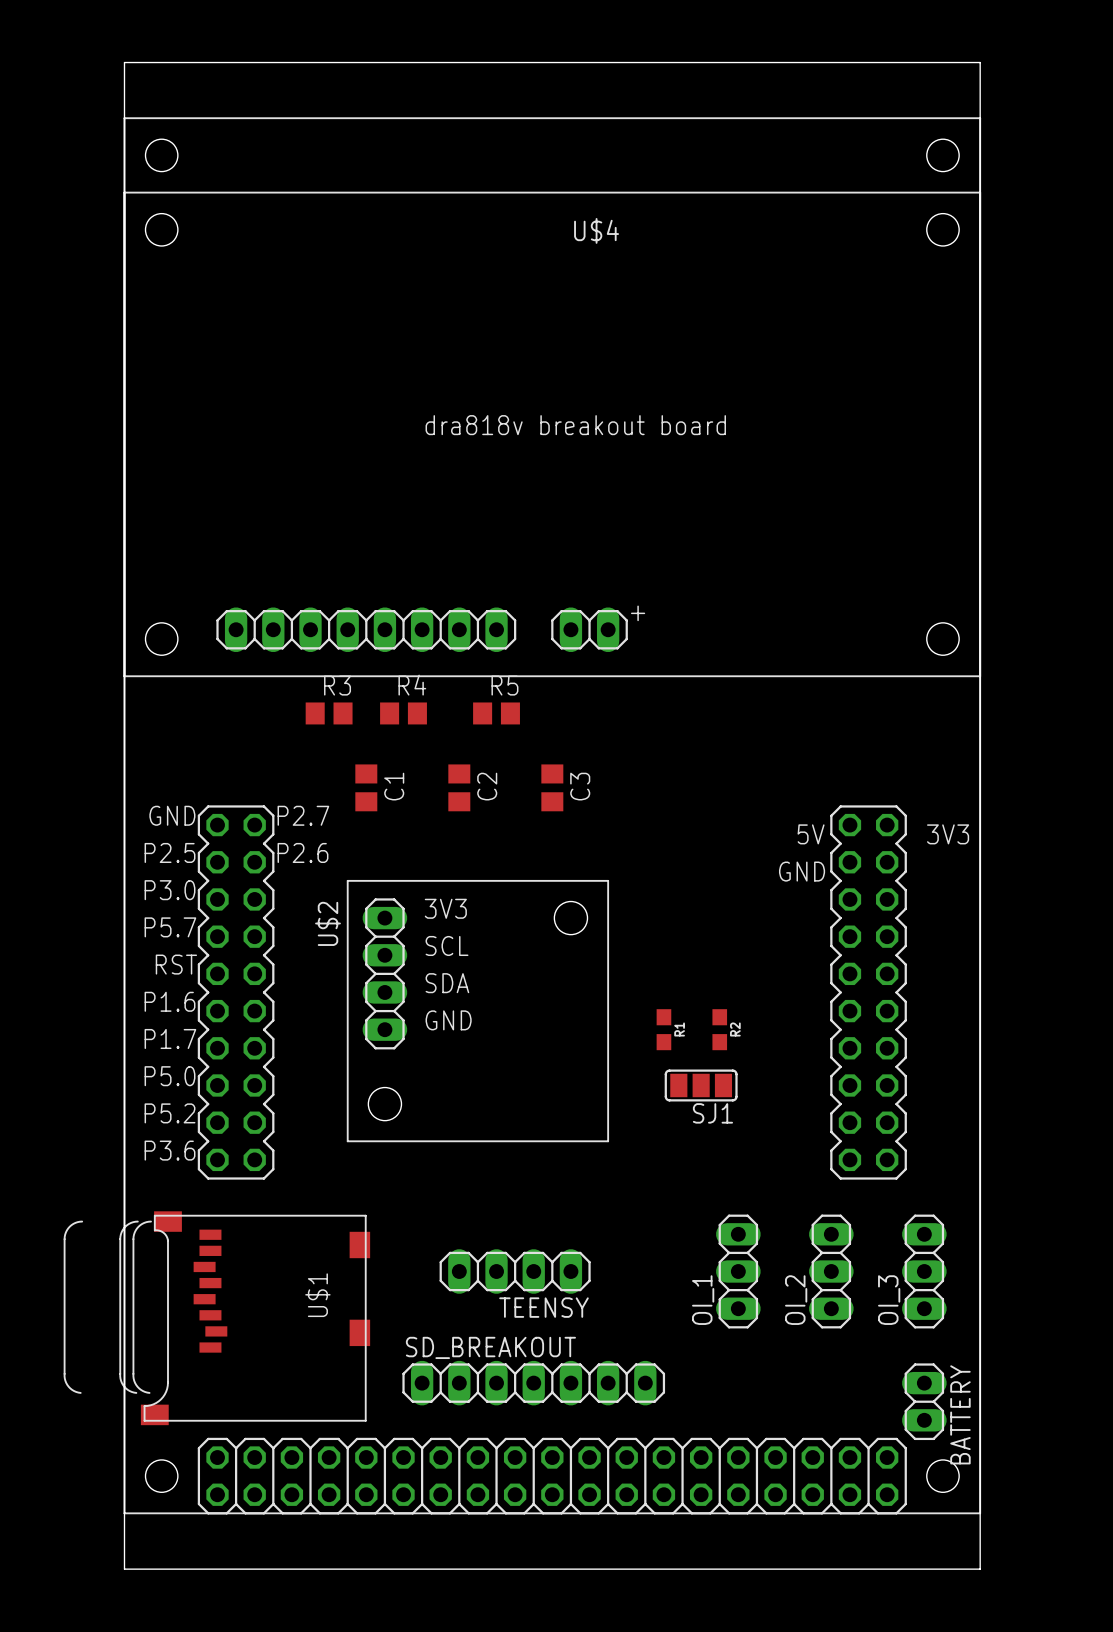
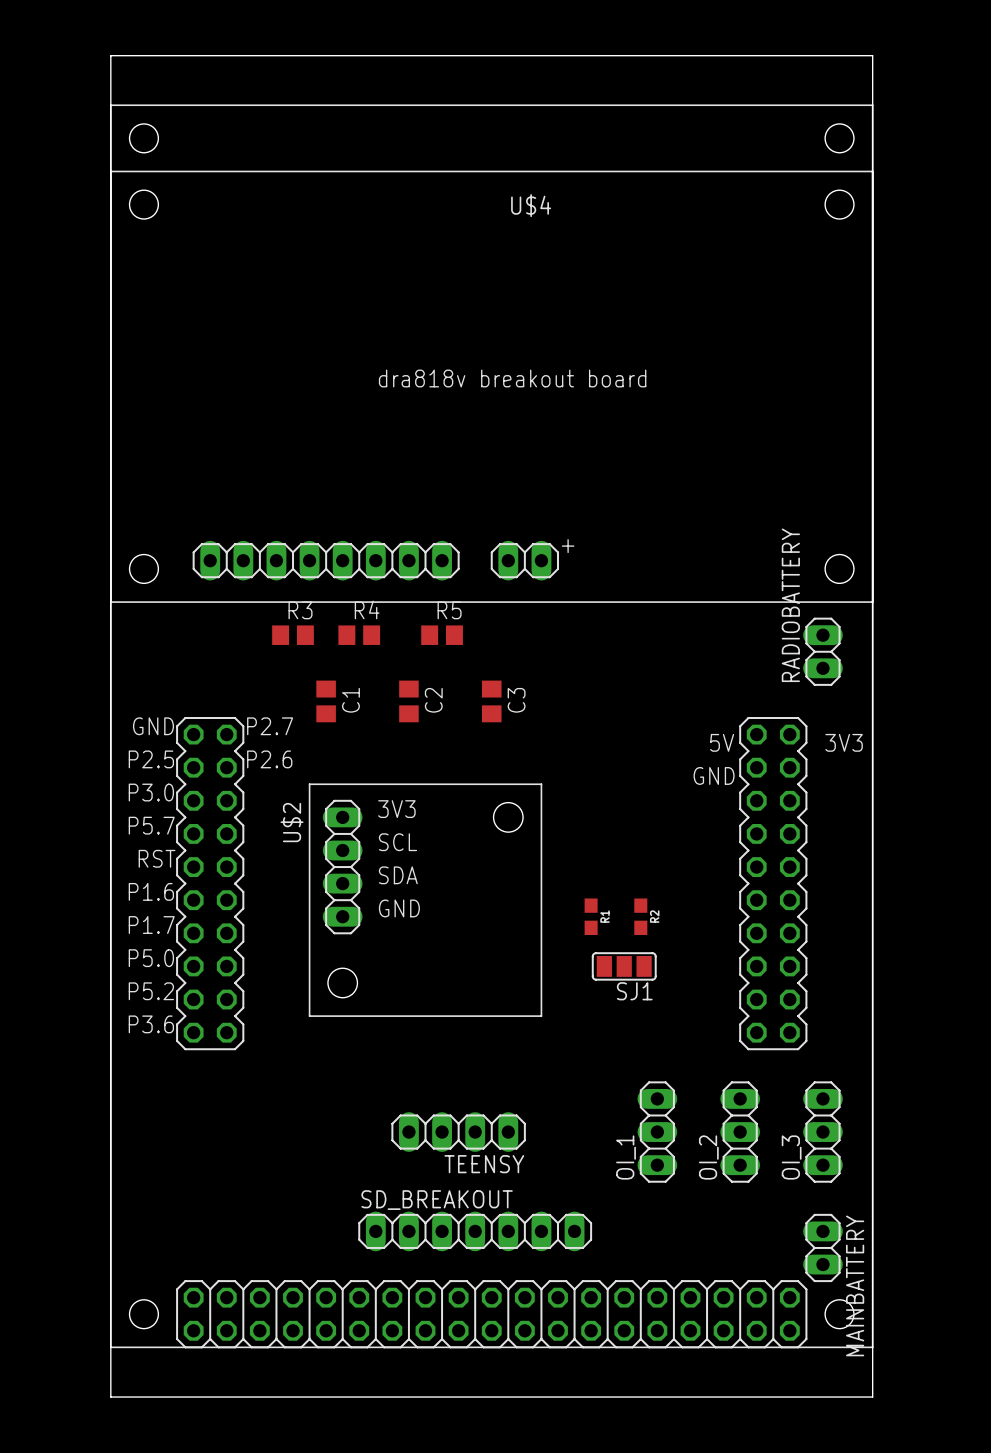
RADIOBATTERY: none -> (822, 651)
U$1: (216, 1318) -> none
BATTERY name: BATTERY (960, 1414) -> MAINBATTERY (855, 1285)

